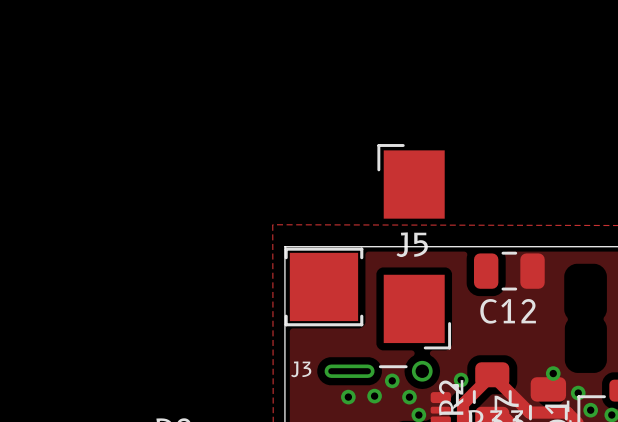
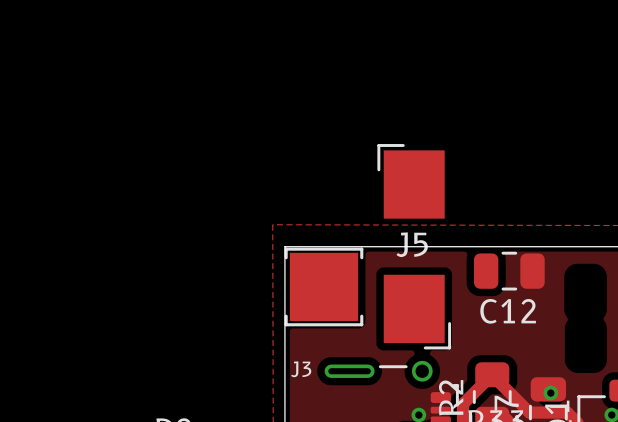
via: (553, 373) -> none
via: (392, 380) -> none
via: (461, 380) -> none
via: none -> (550, 393)
via: (578, 393) -> none
via: (374, 396) -> none
via: (348, 397) -> none
via: (409, 397) -> none
via: (590, 410) -> none

